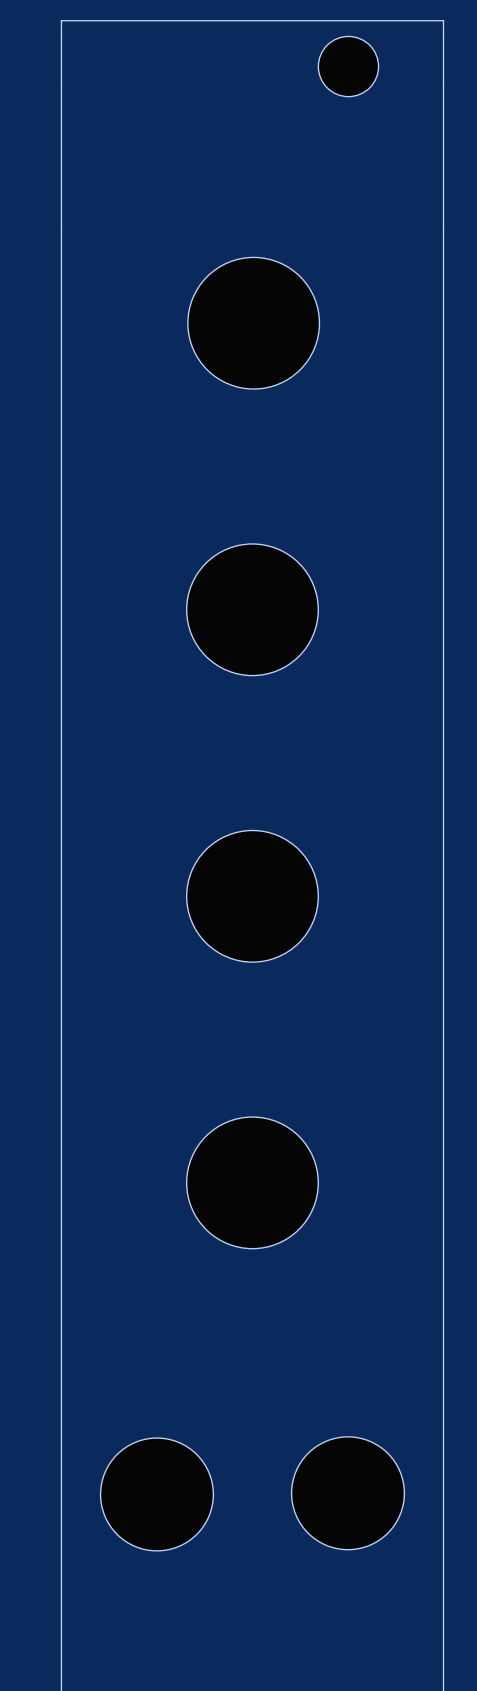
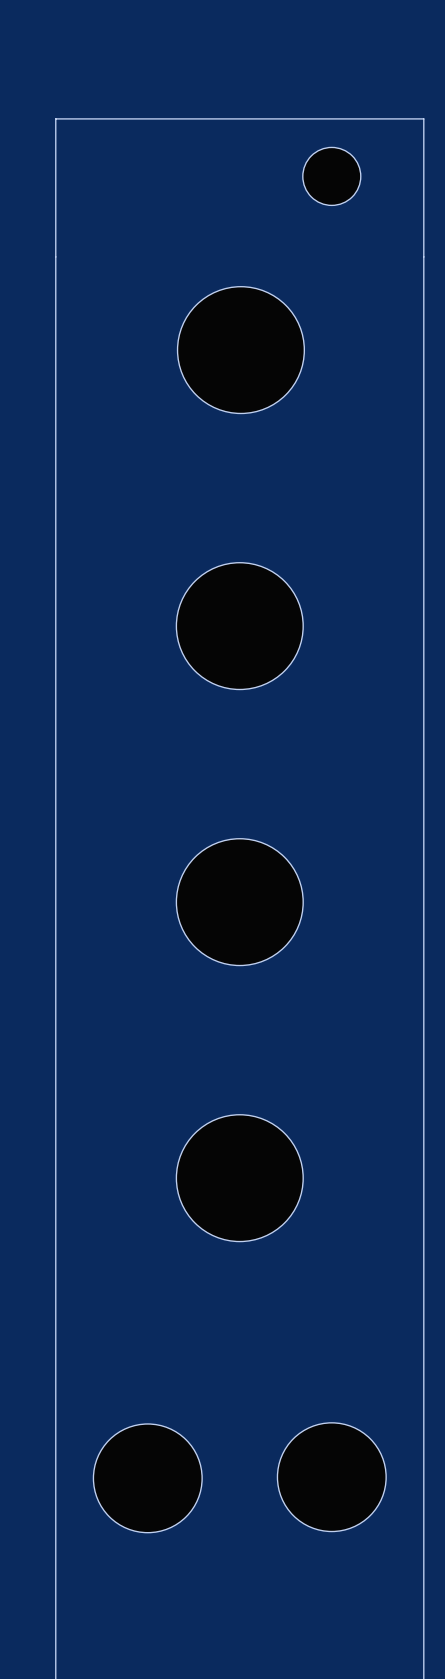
part position: (348, 66) -> (331, 176)
board edge: (443, 83) (443, 20) (61, 20) (61, 83) -> (423, 118) (55, 118)

